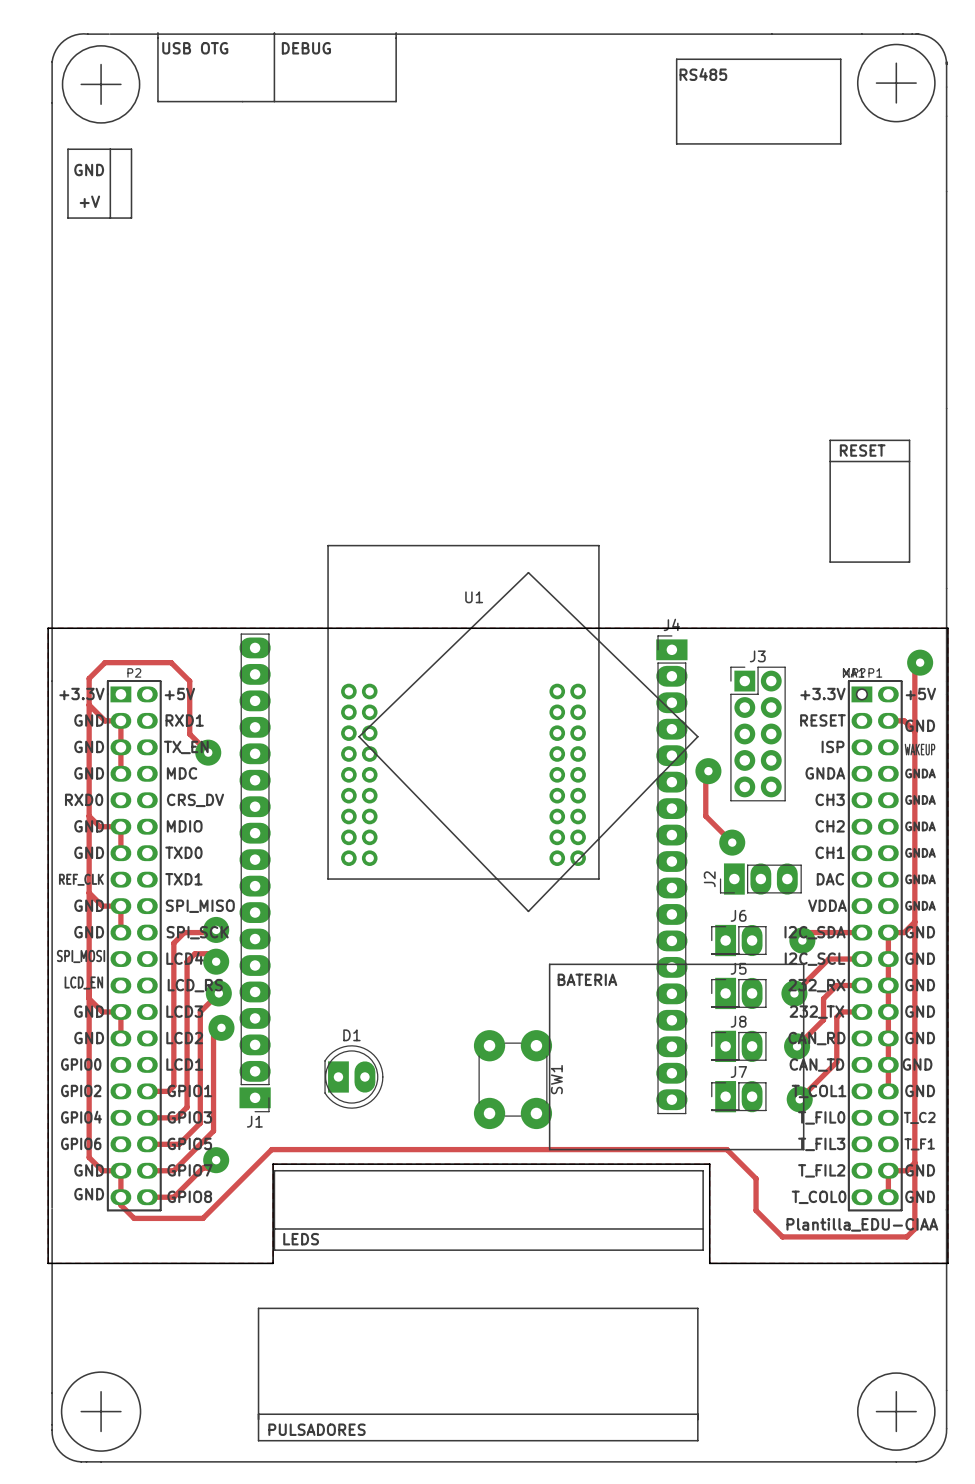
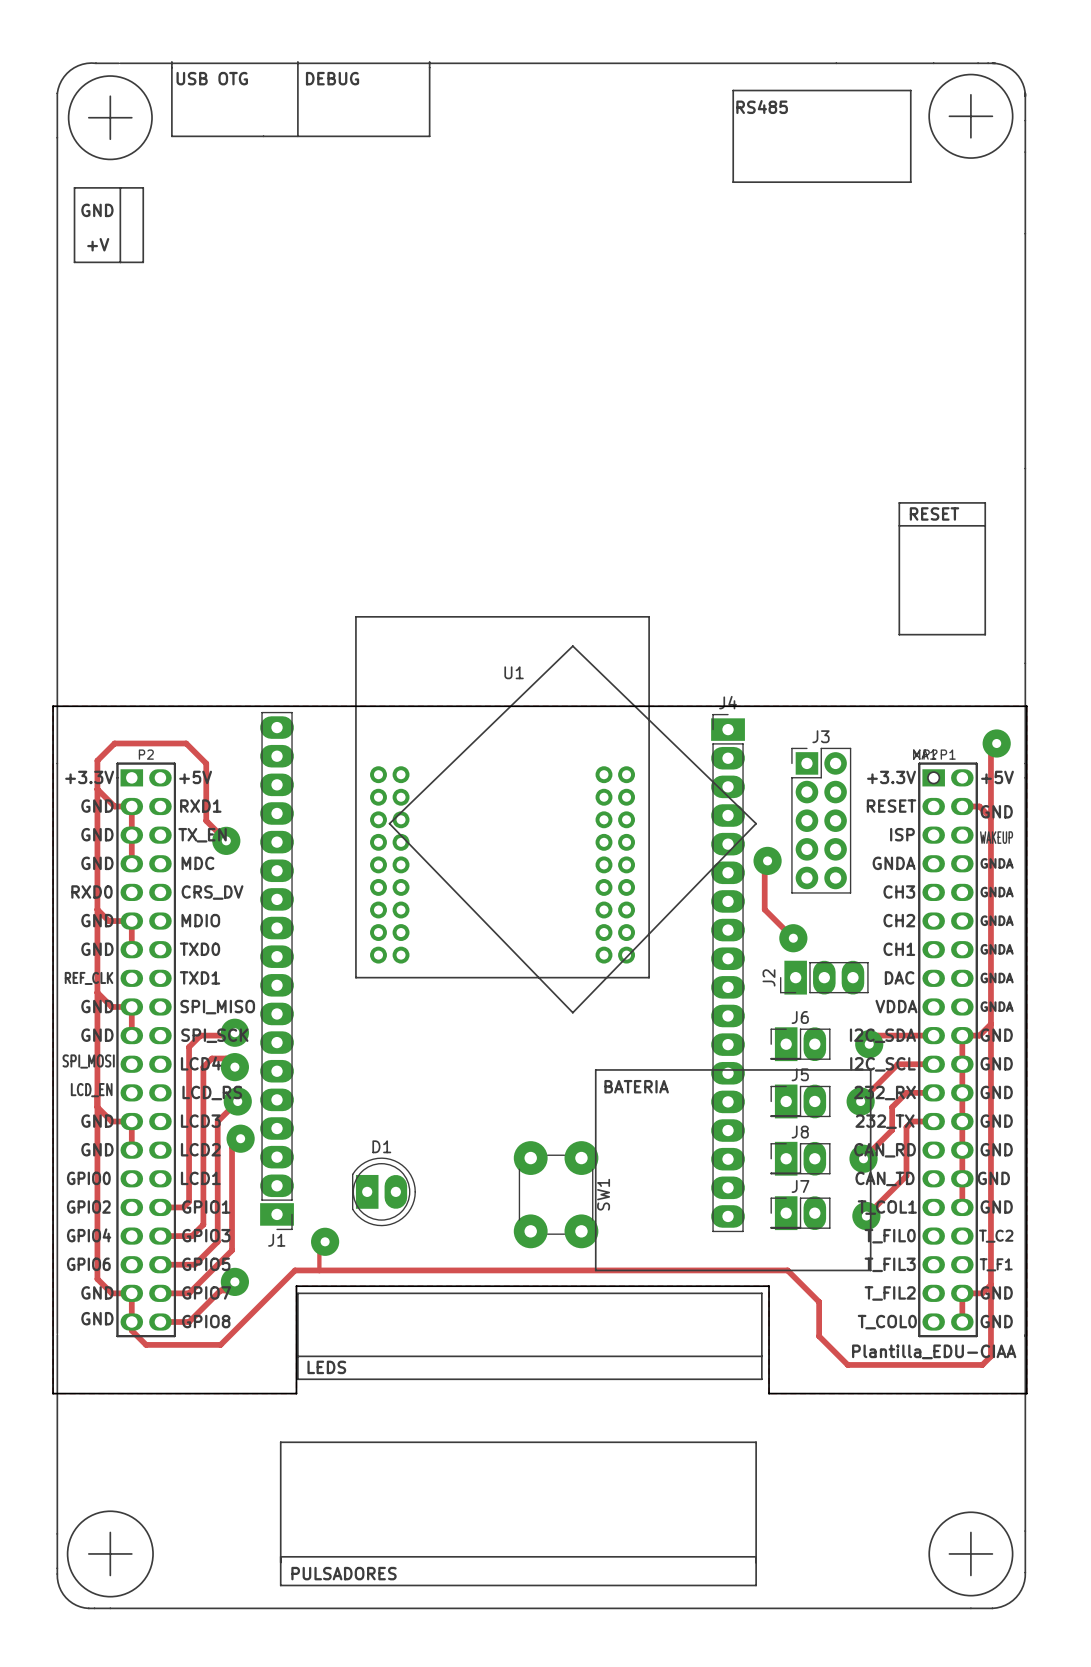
track: none -> (325, 1241) (319, 1247) (319, 1270)
via: none -> (325, 1241)

